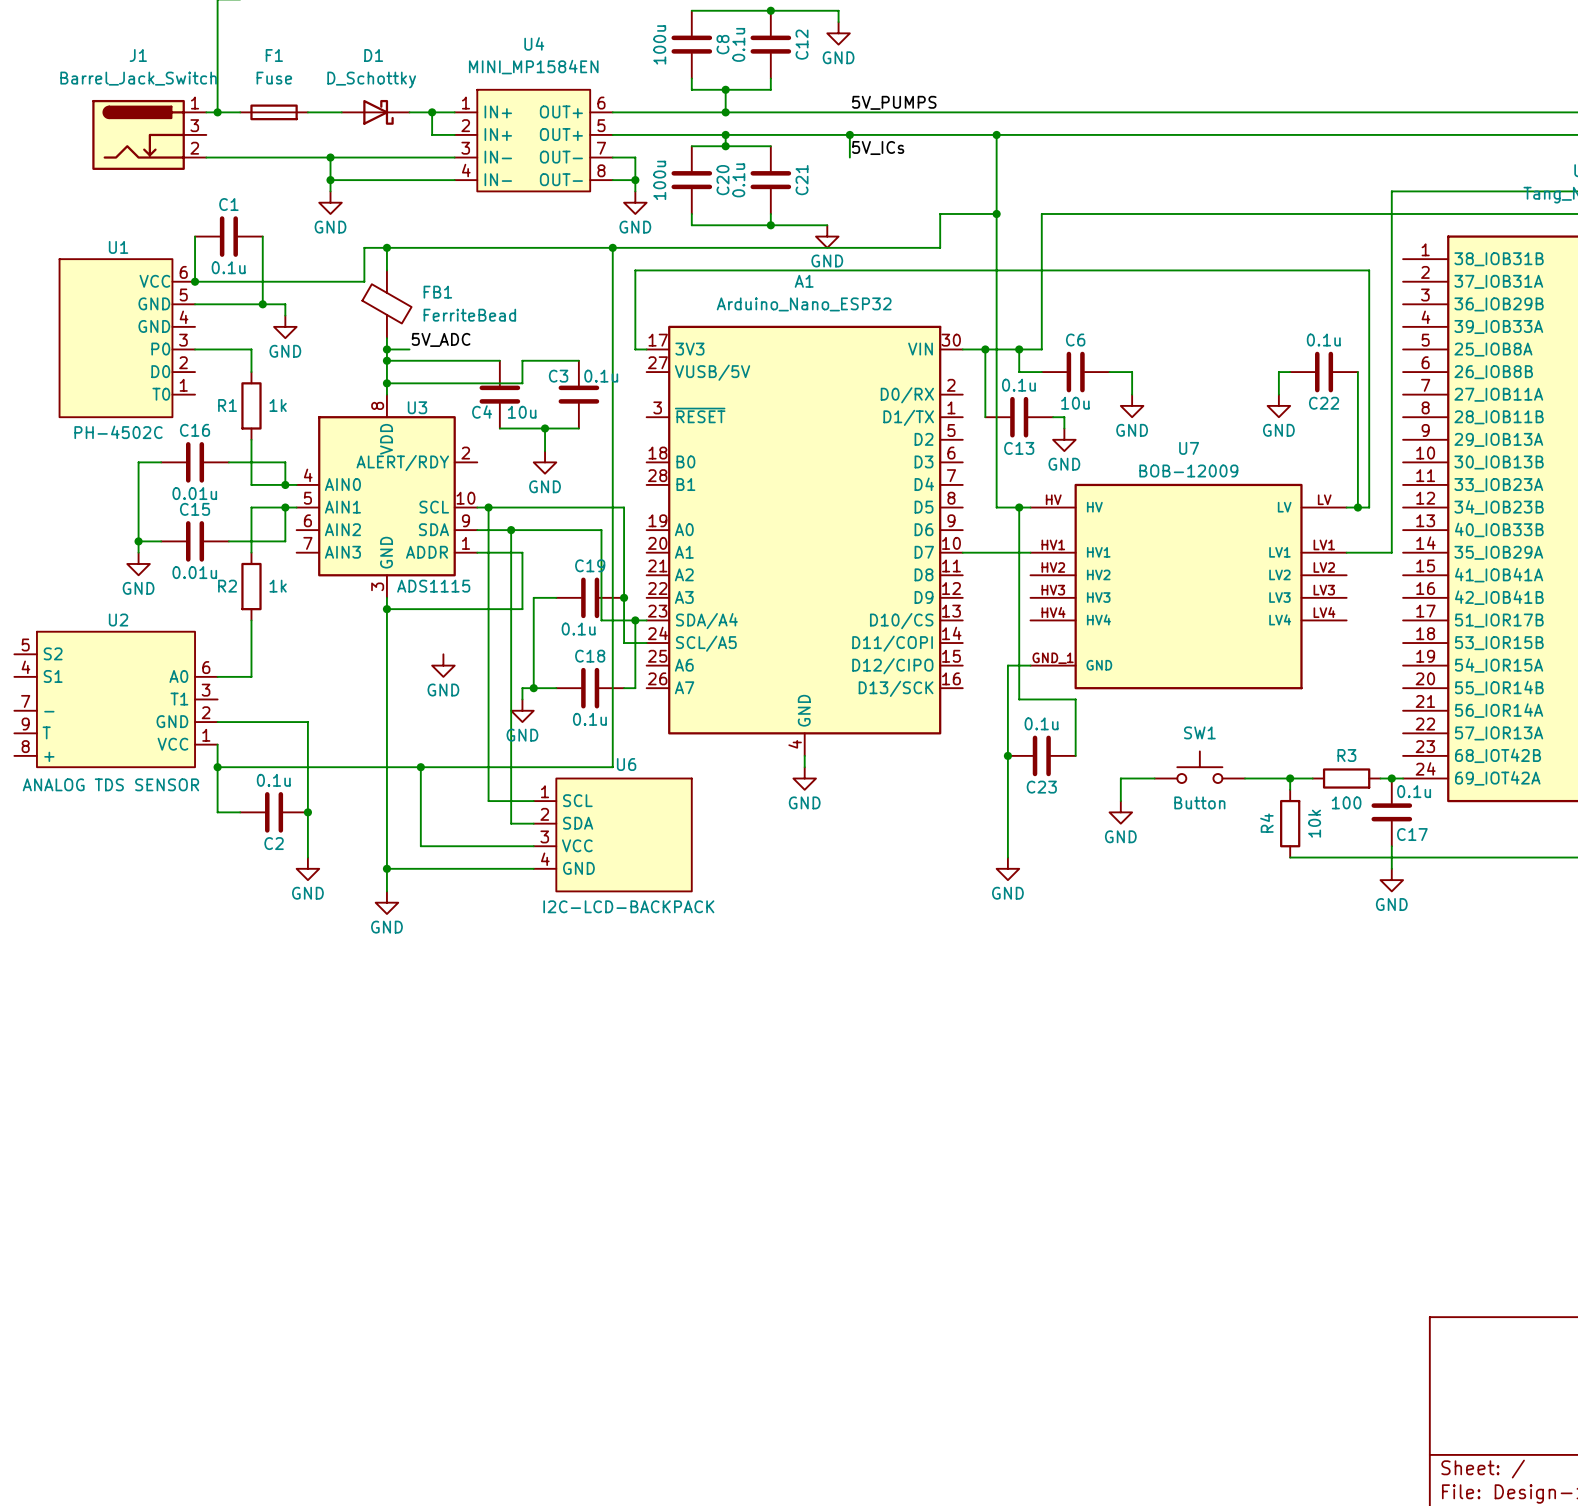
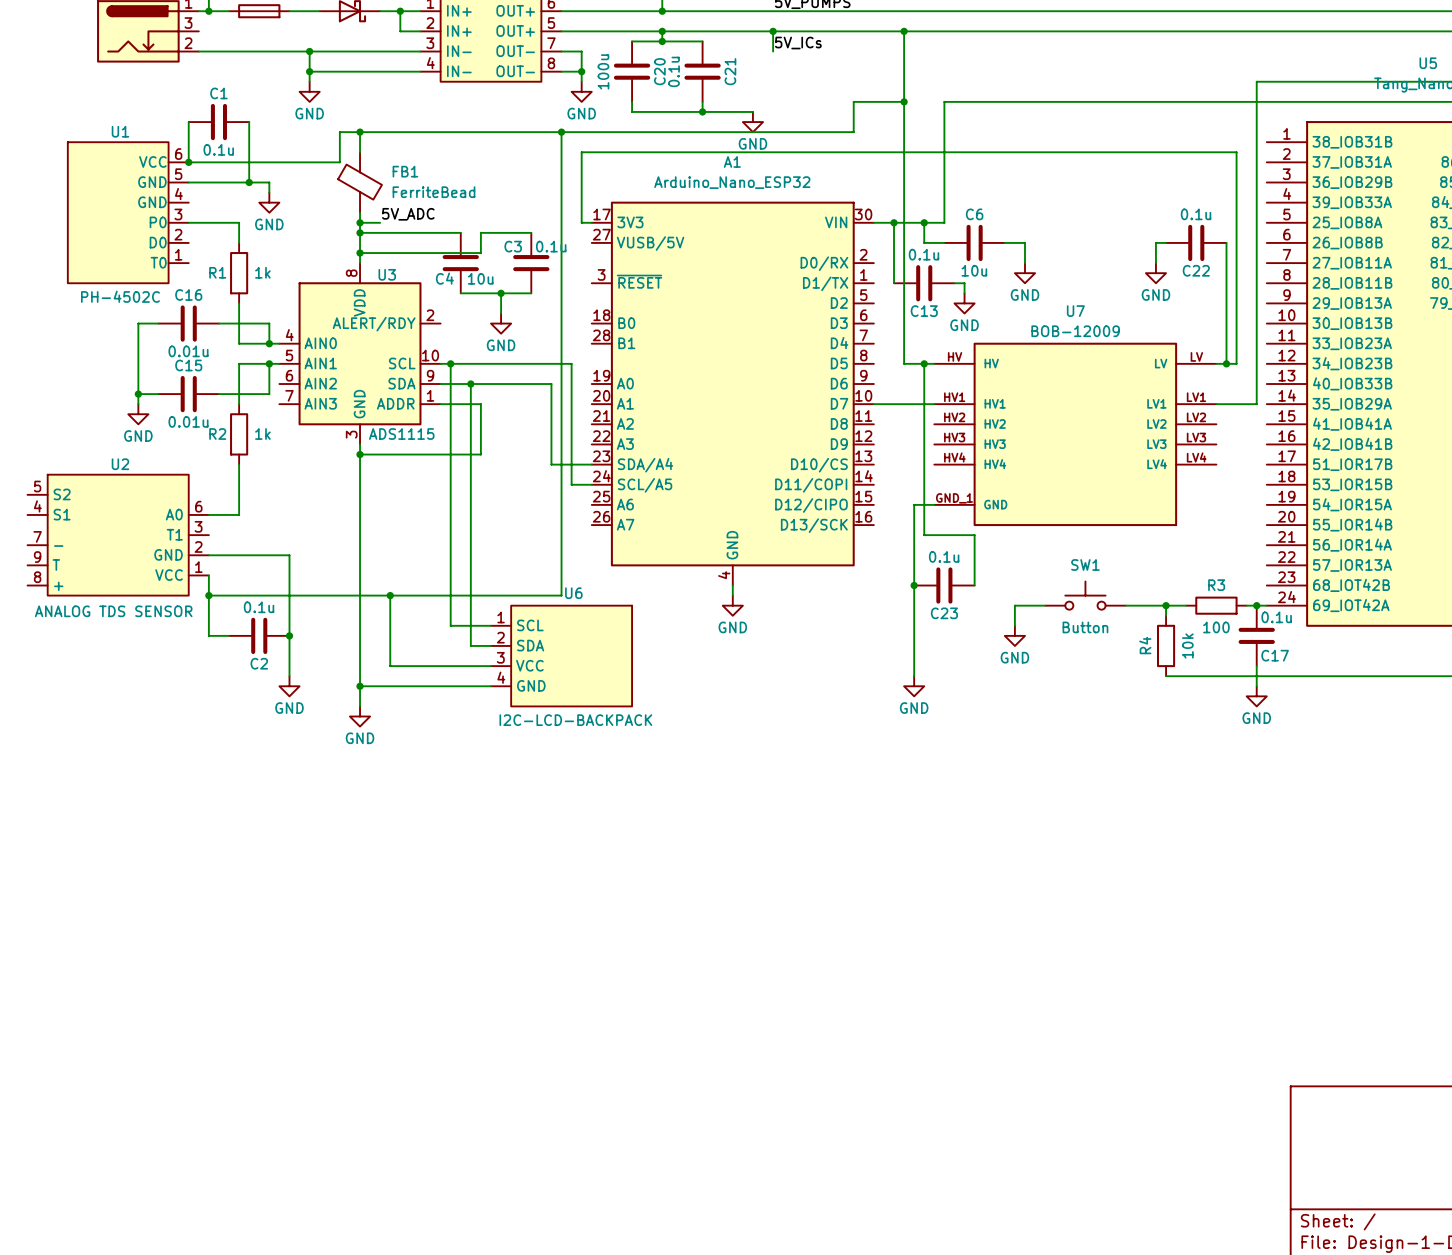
wire: (556, 597) (533, 597) (533, 688) -> none
C19: 0.1u (590, 597) -> none
junction: (624, 597) -> none
wire: (635, 620) (635, 688) (624, 688) -> none
junction: (635, 620) -> none
power symbol: GND (443, 665) -> none
junction: (533, 688) -> none
wire: (556, 688) (522, 688) (522, 699) -> none
C18: 0.1u (590, 688) -> none
power symbol: GND (522, 710) -> none

